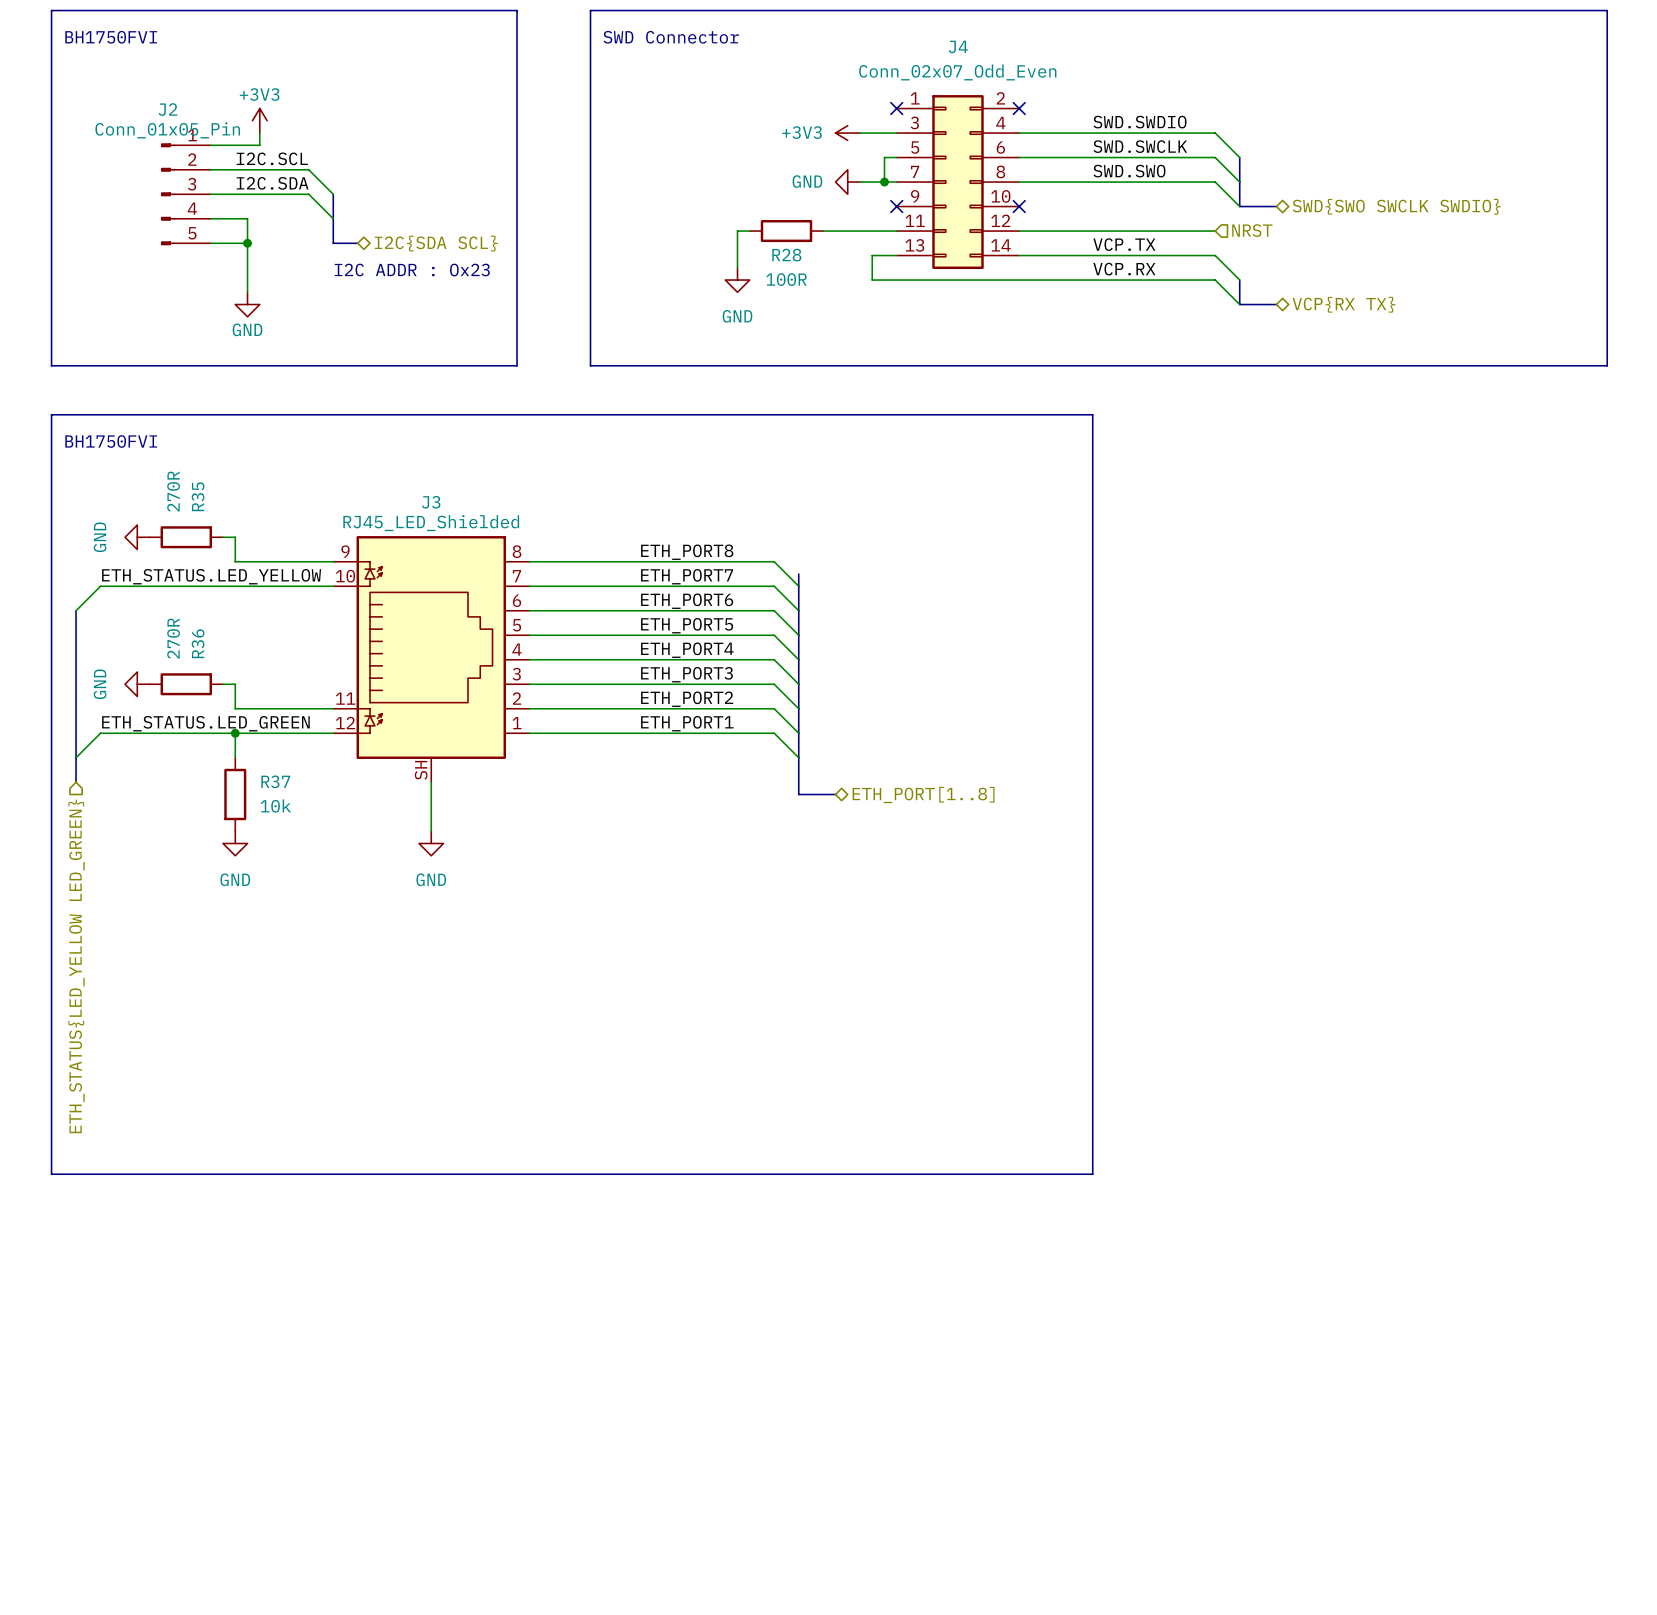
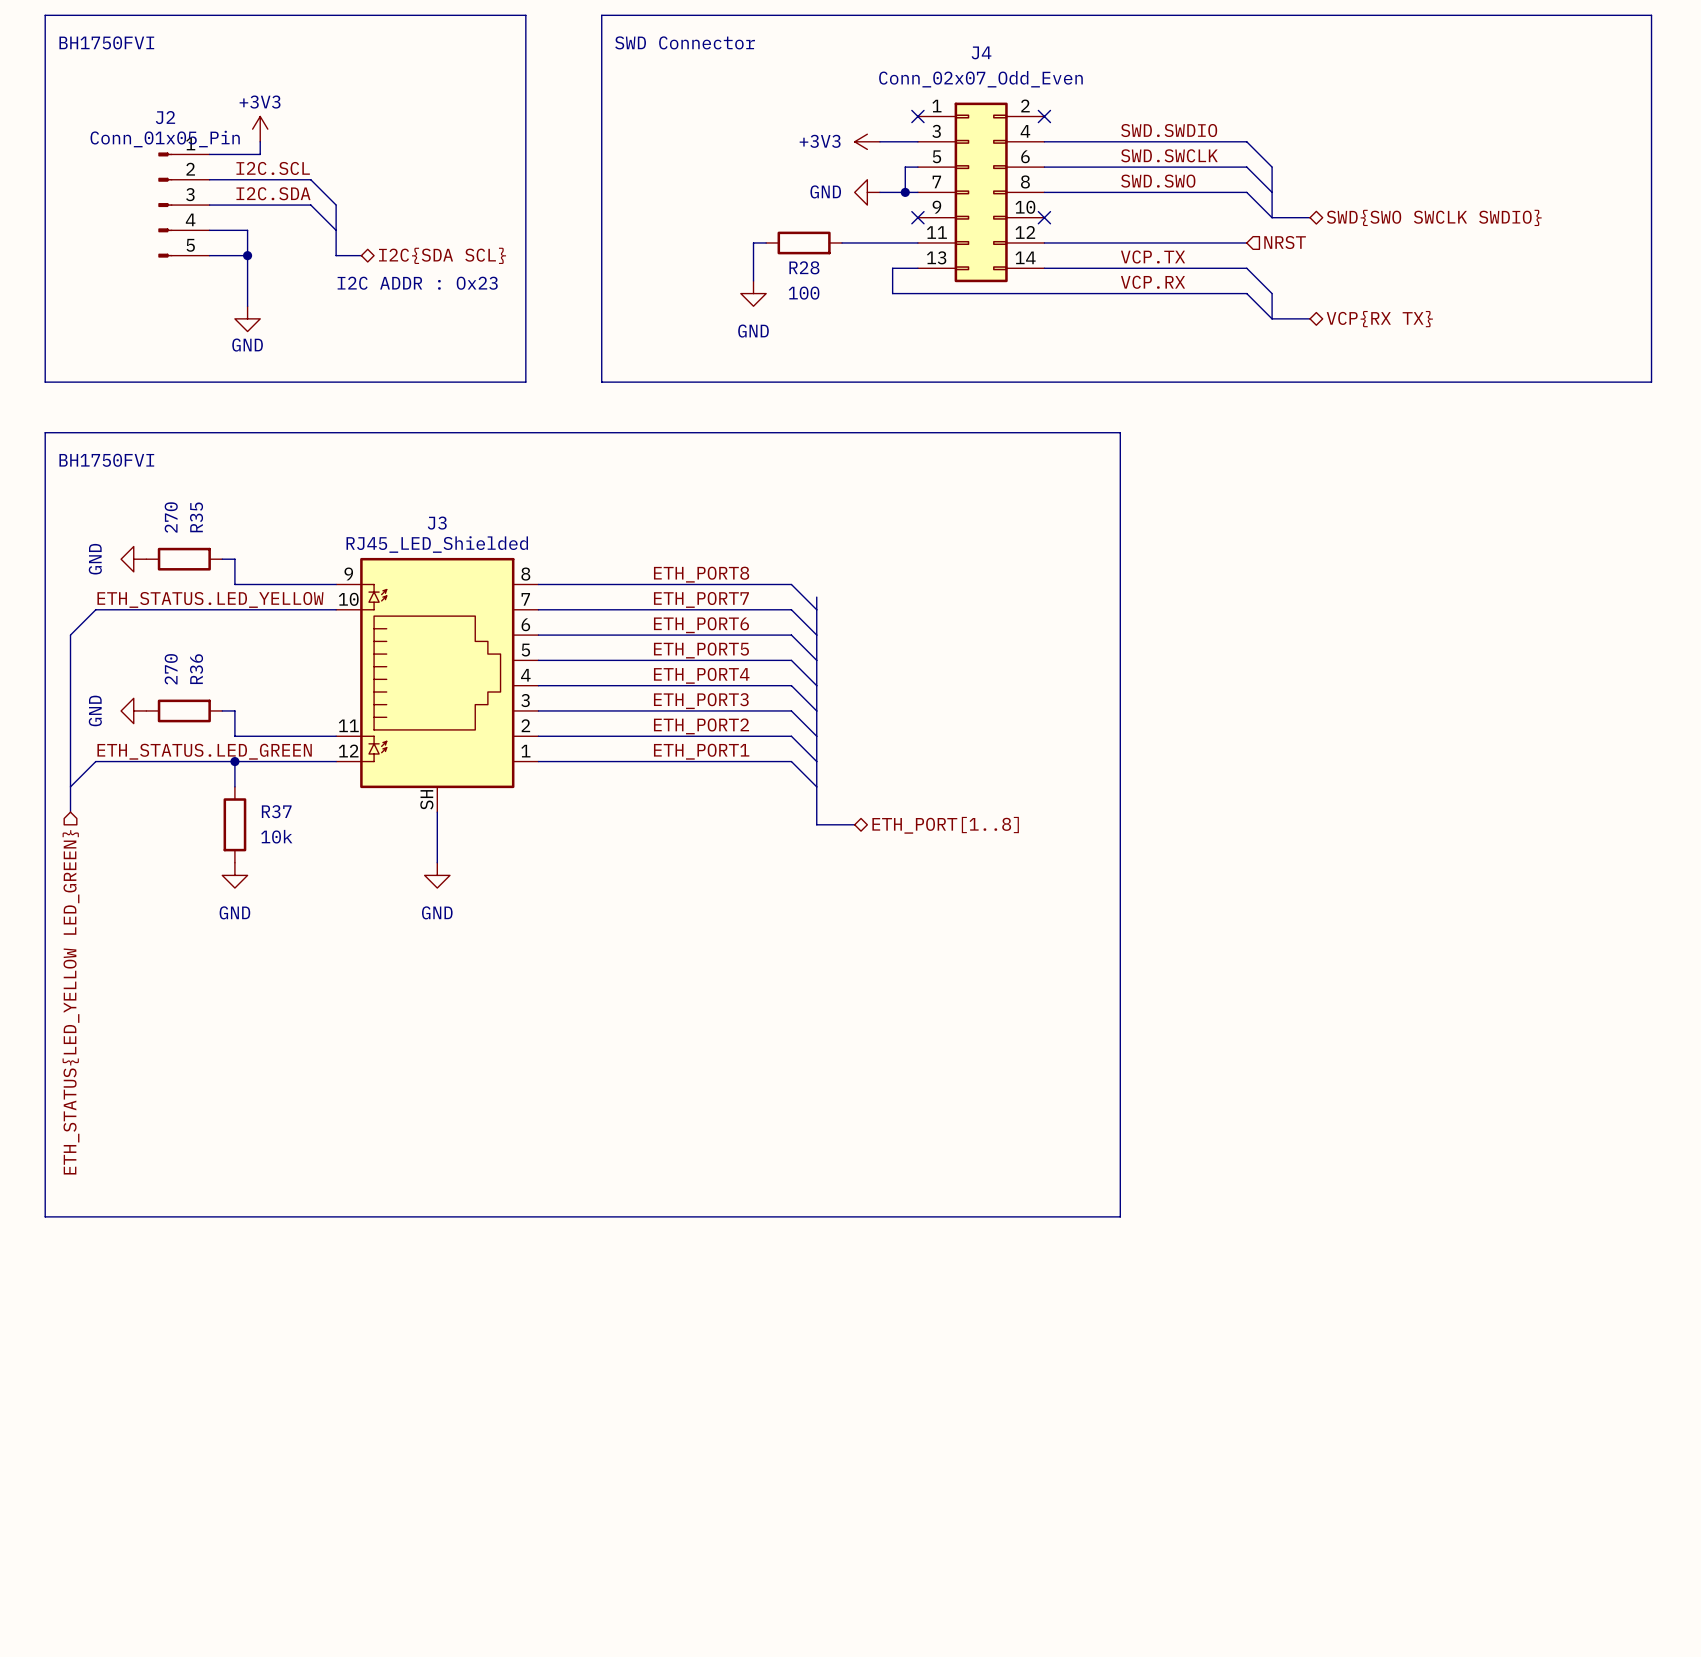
R28 value: 100R (786, 279) -> 100 (804, 293)
R35 value: 270R (173, 491) -> 270 (171, 517)
R36 value: 270R (173, 638) -> 270 (171, 669)

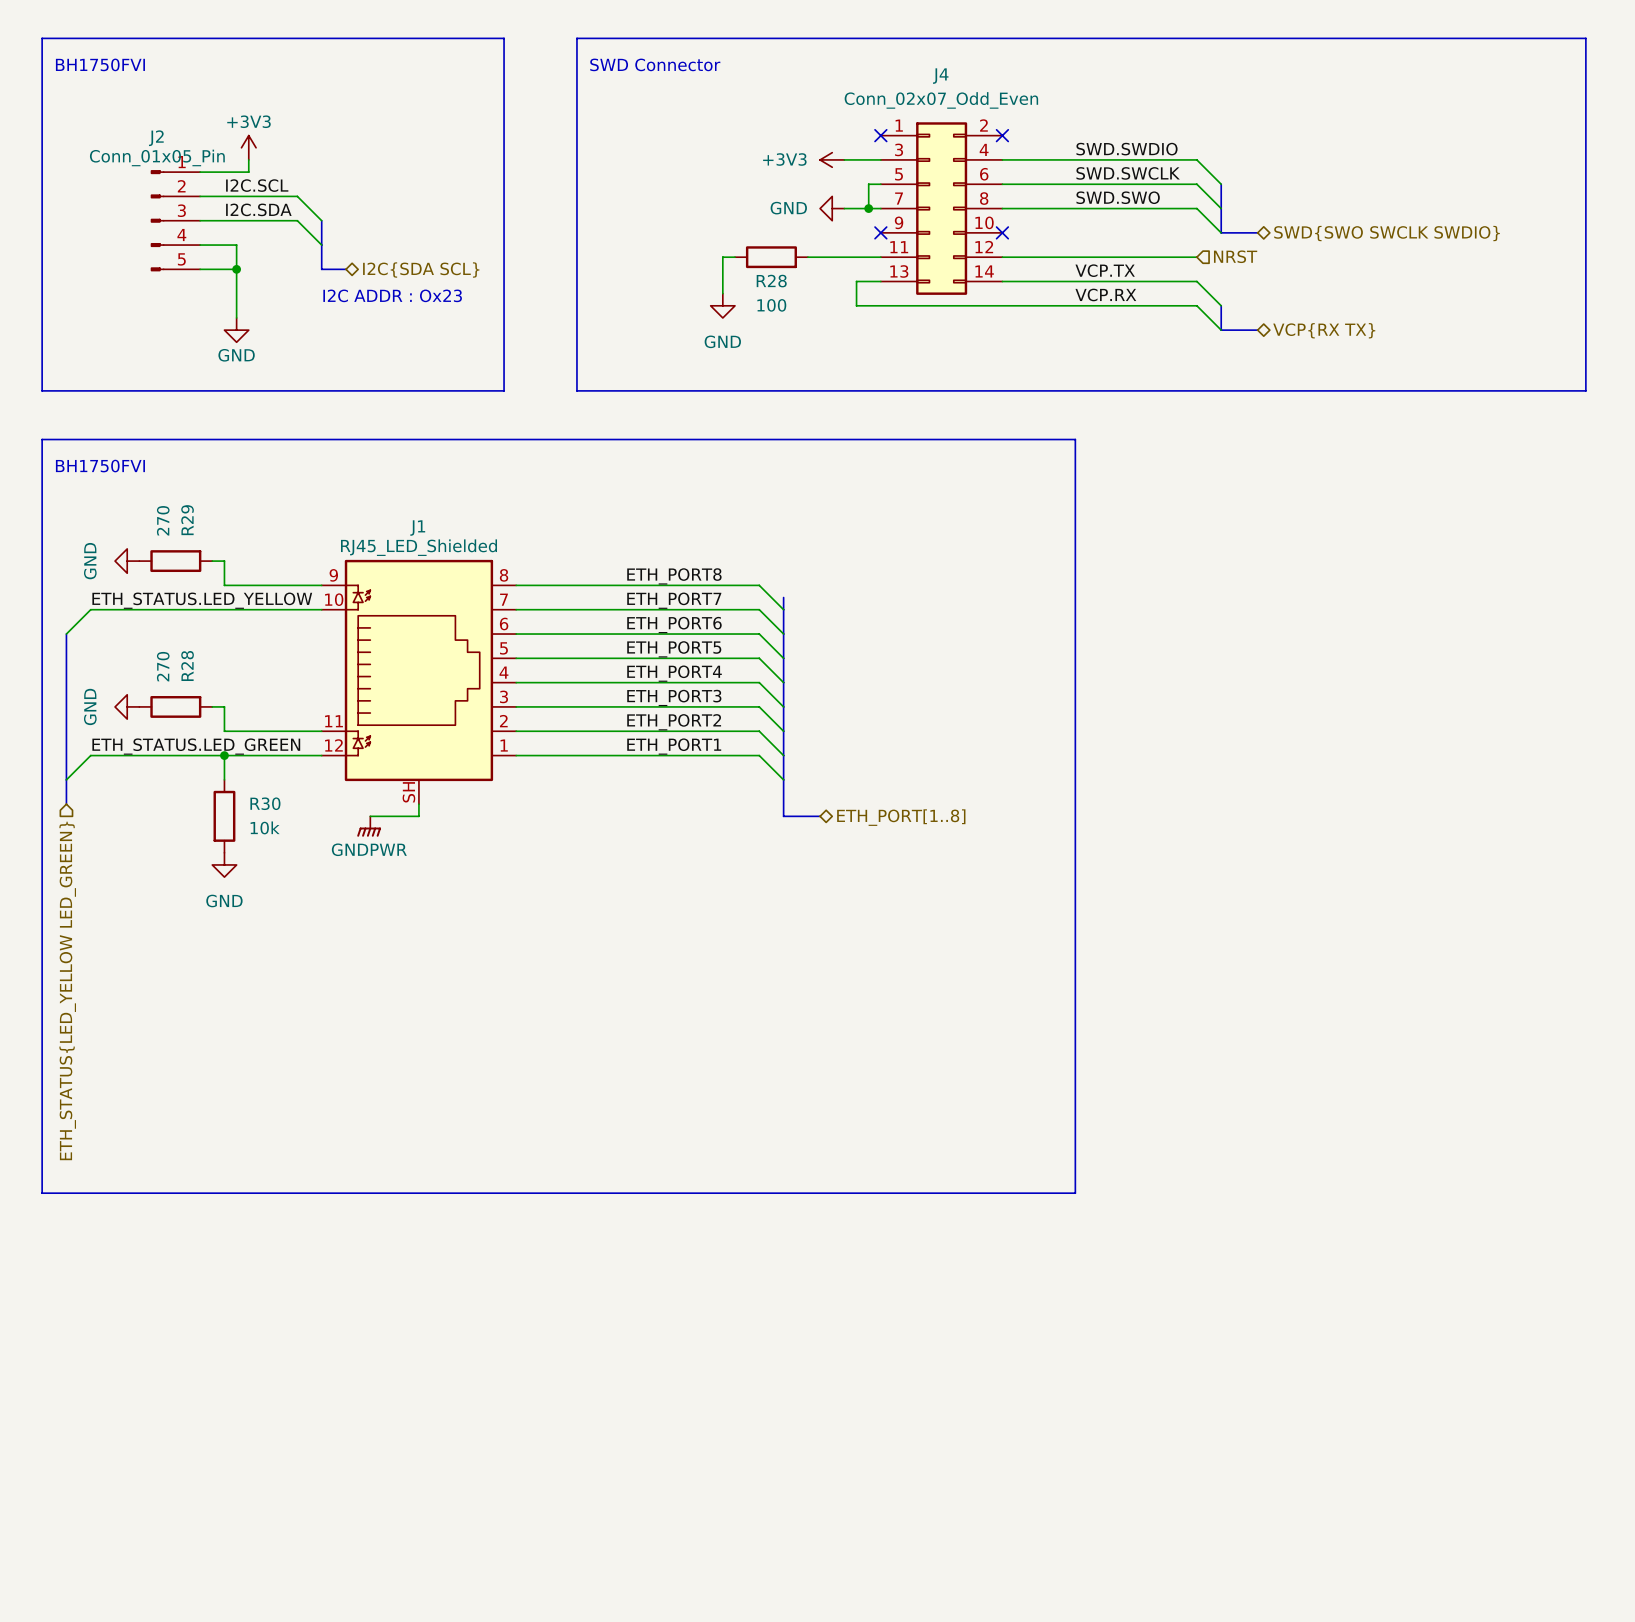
R35 name: R35 (196, 517) -> R29 (187, 520)
J3 name: J3 (437, 523) -> J1 (417, 528)
R36 name: R36 (196, 669) -> R28 (187, 665)
R37 name: R37 (276, 811) -> R30 (265, 803)
wire: (437, 824) (437, 862) -> (418, 816) (370, 816)
power symbol: none -> GNDPWR (369, 826)
power symbol: GND (437, 875) -> none

